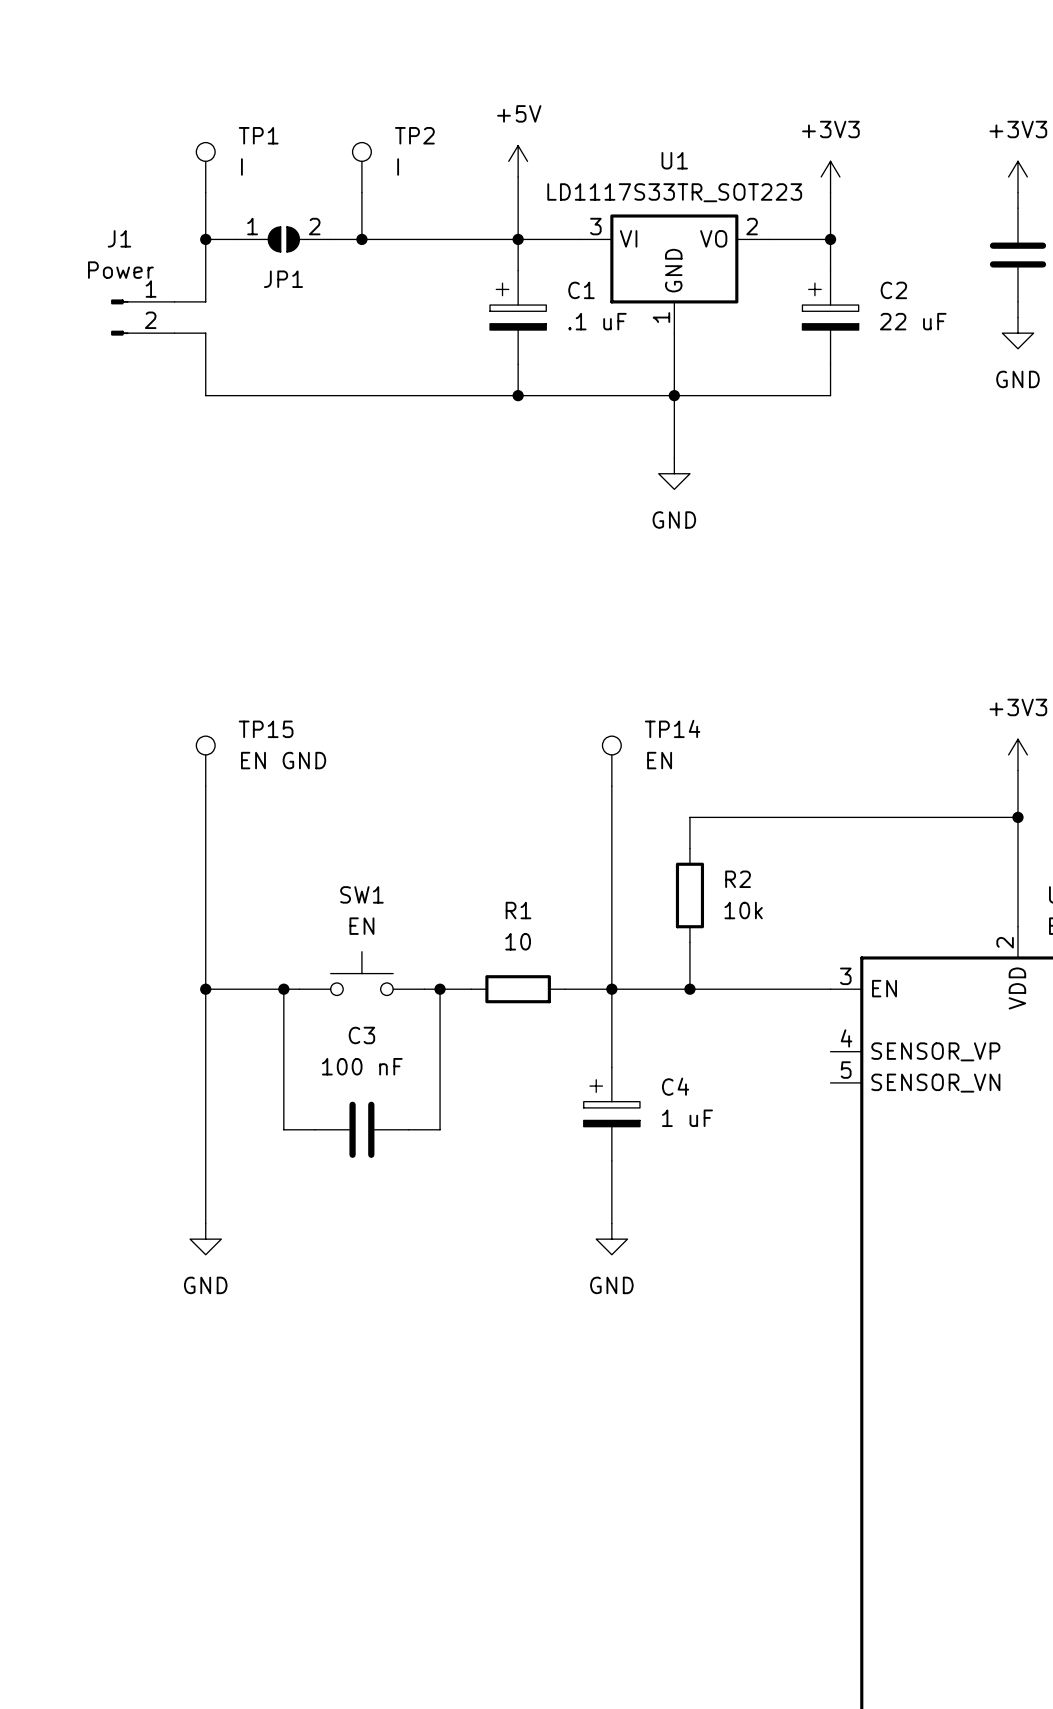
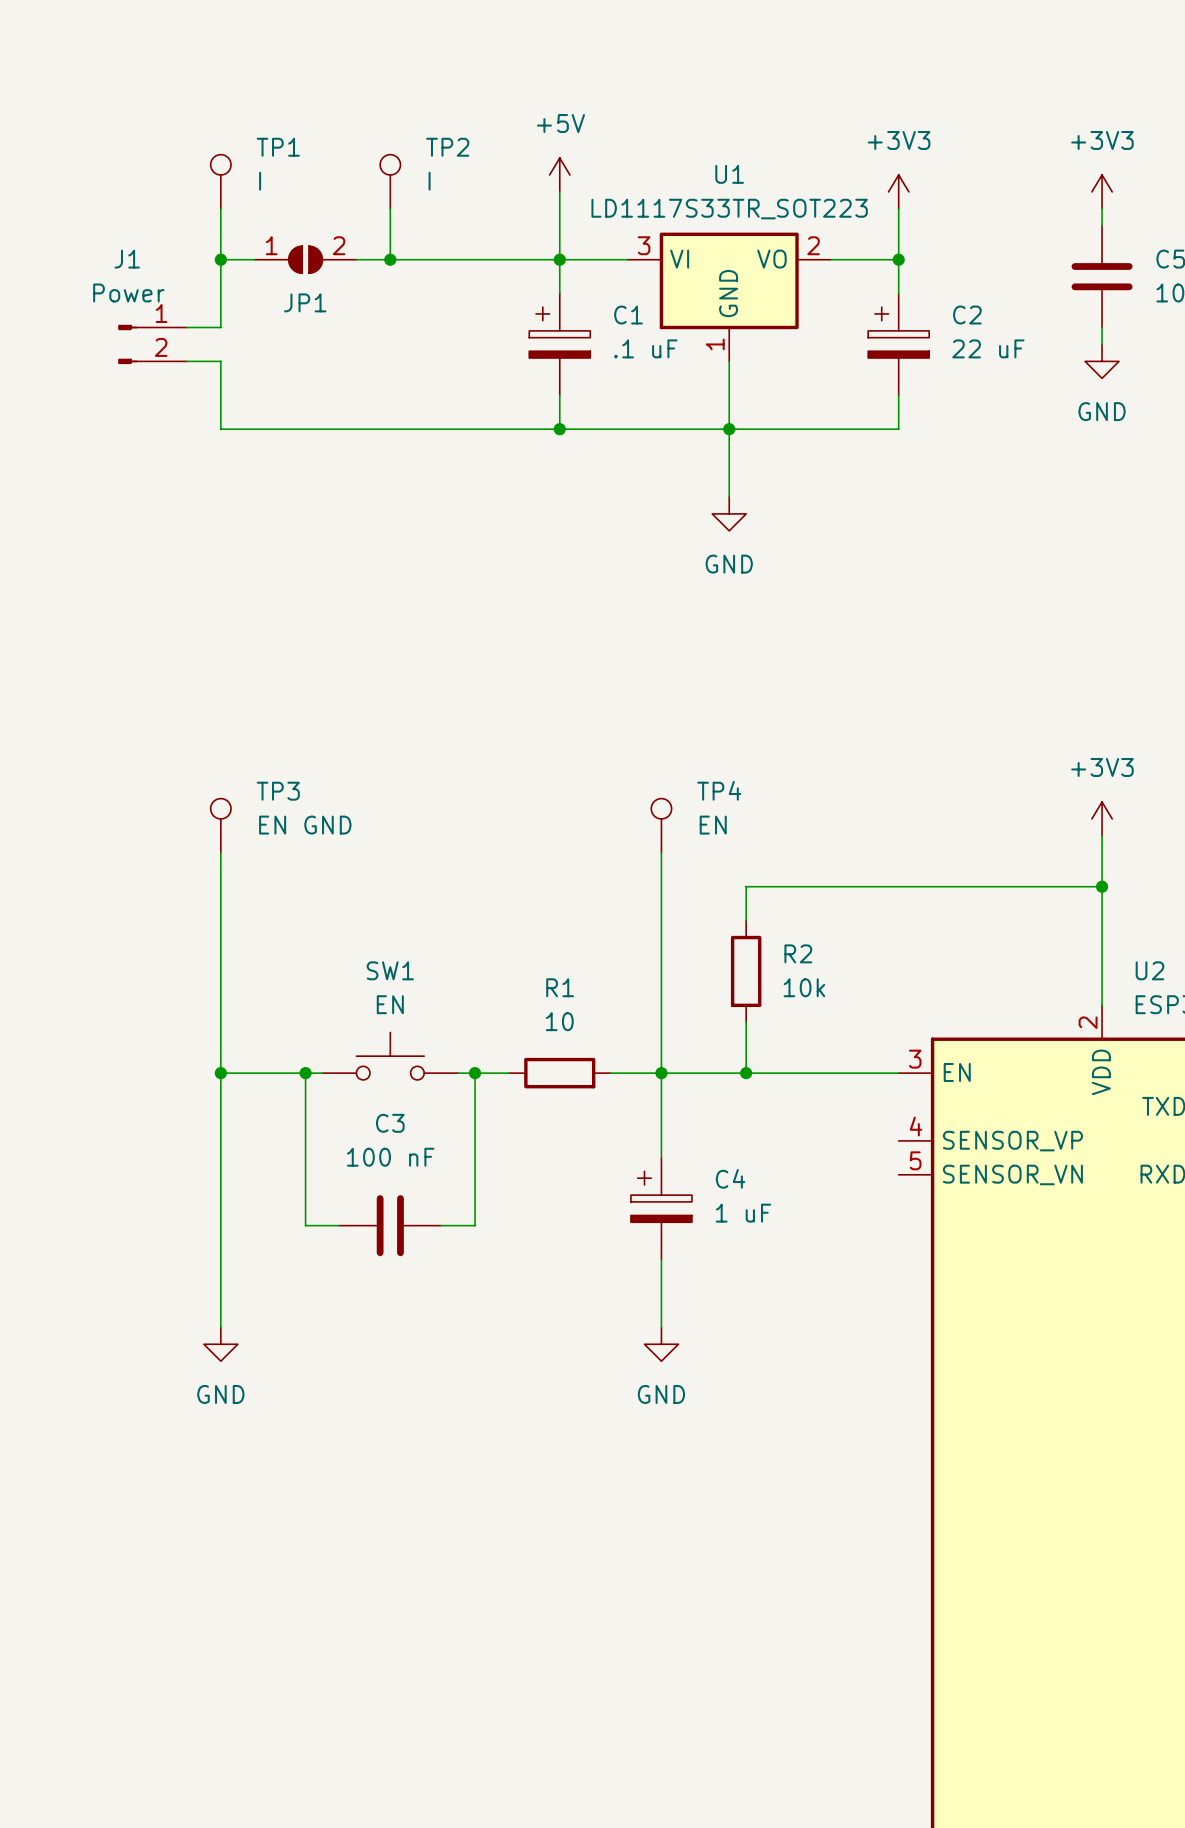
TP14 name: TP14 (672, 728) -> TP4 (719, 790)
TP15 name: TP15 (266, 729) -> TP3 (278, 791)

